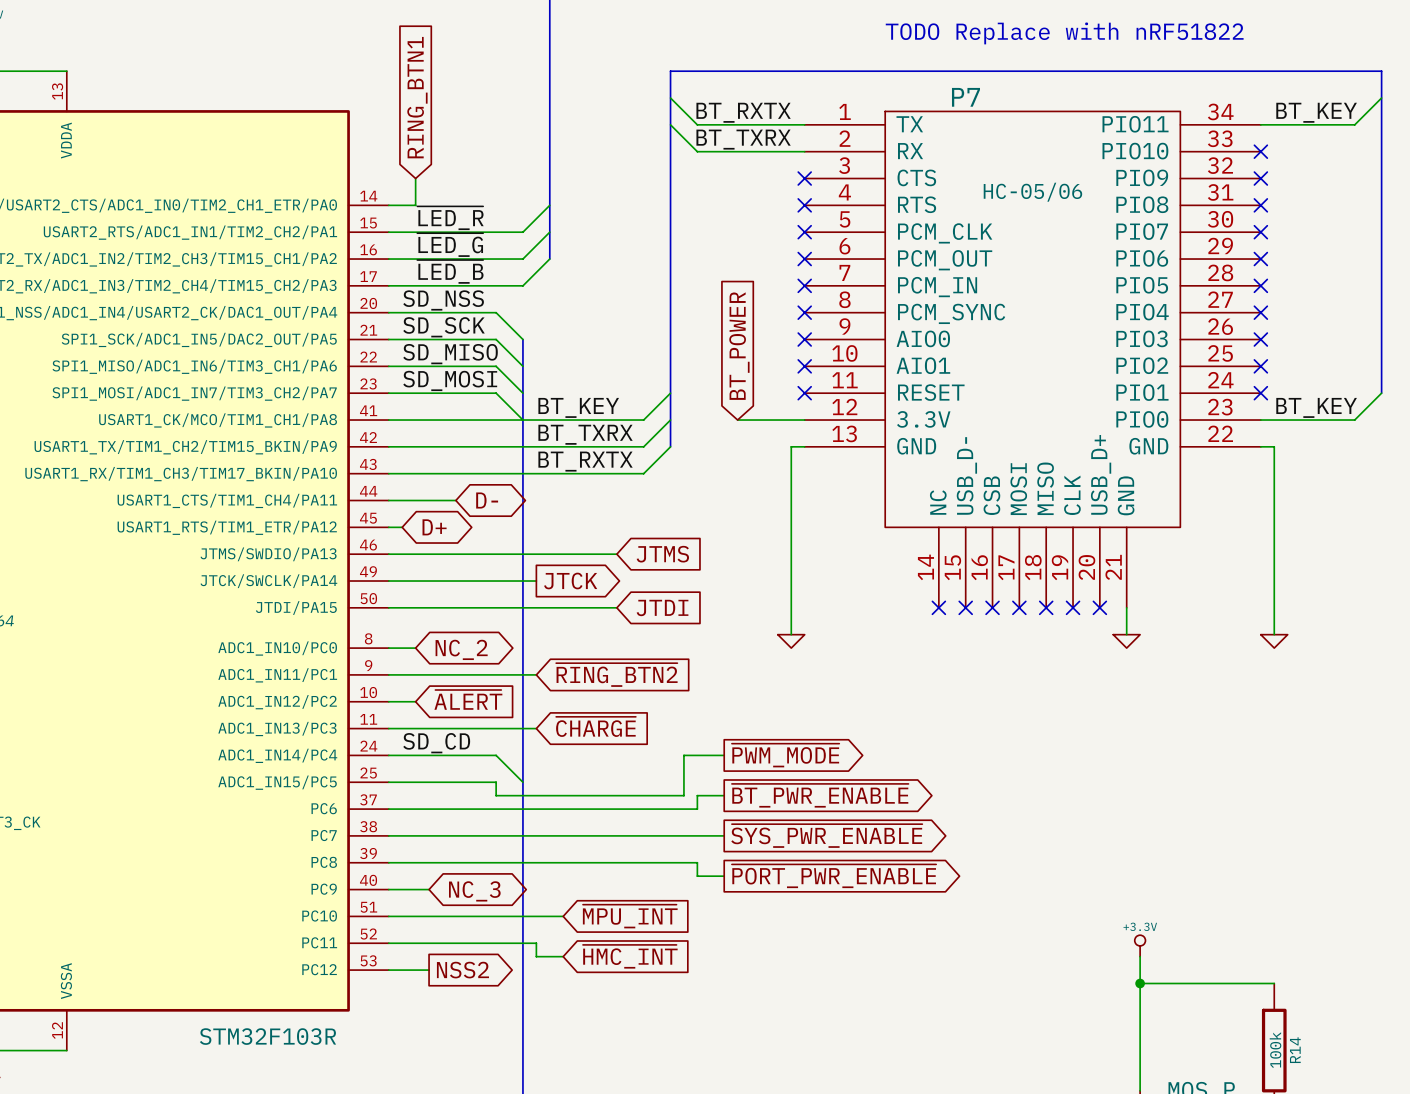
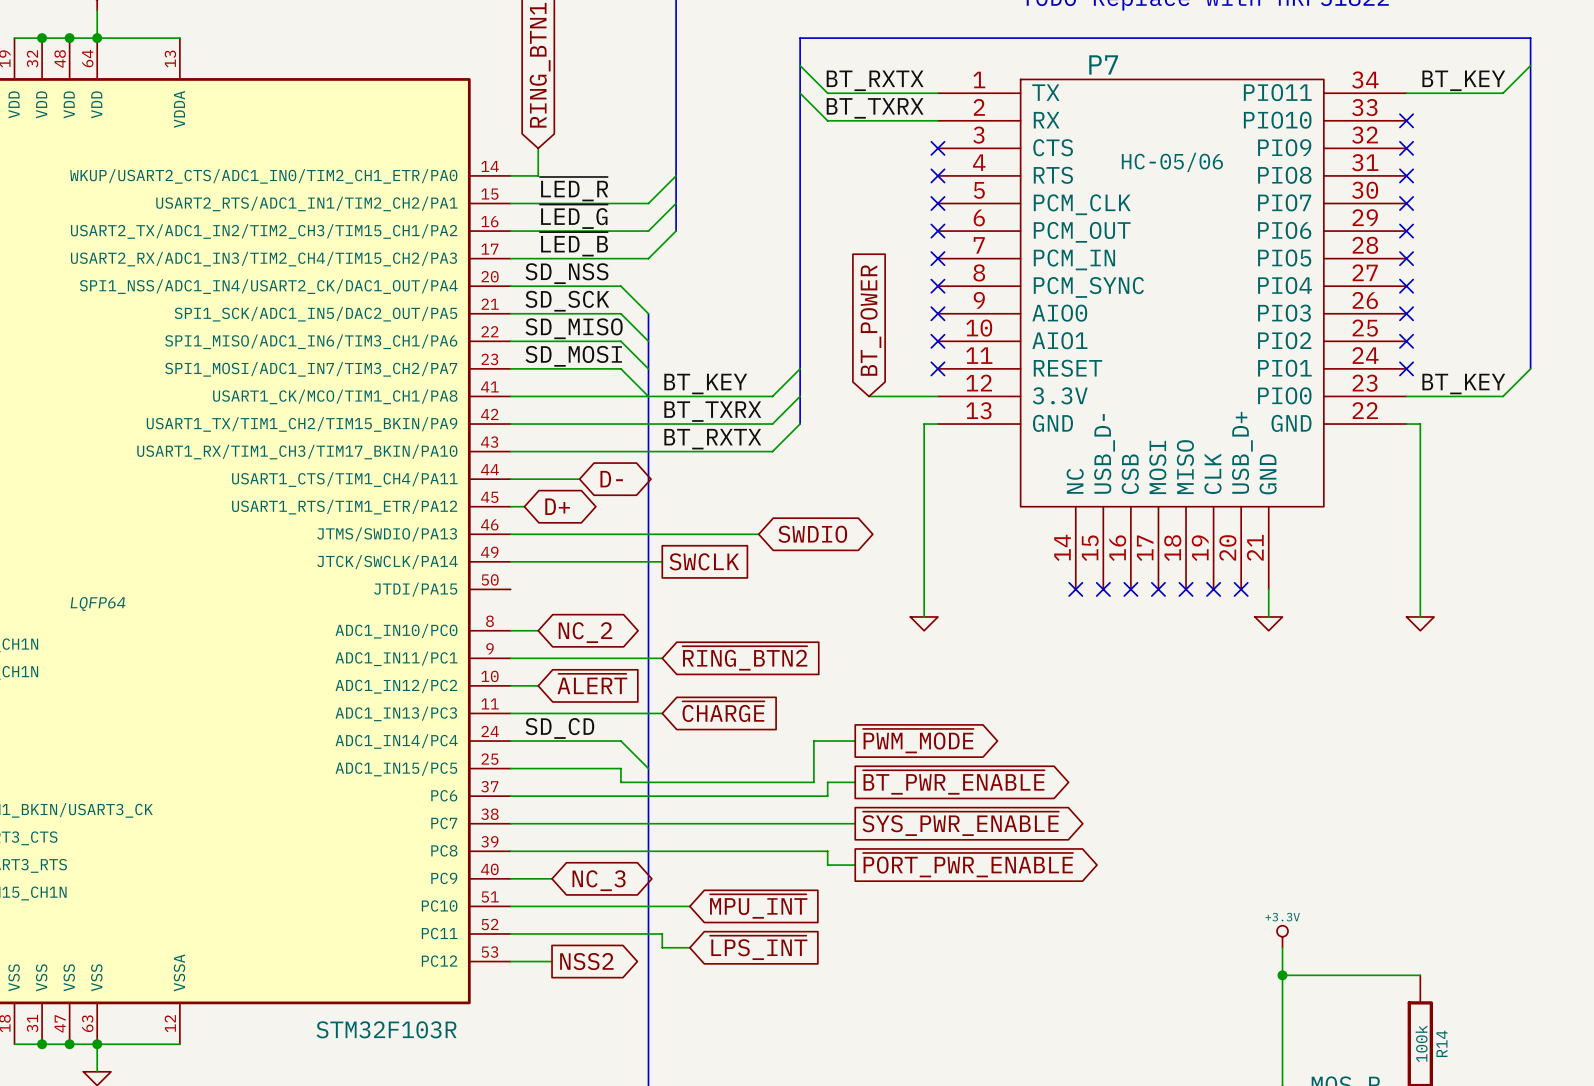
wire: none -> (744, 534) (758, 534)
global label: JTMS (662, 554) -> none
global label: none -> SWDIO (812, 534)
global label shape: output (570, 581) -> passive (704, 561)
global label: JTCK (570, 581) -> SWCLK (704, 561)
wire: (388, 607) (616, 607) -> none
global label: JTDI (662, 607) -> none
global label: ~{HMC_INT} (630, 956) -> ~{LPS_INT} (758, 947)

